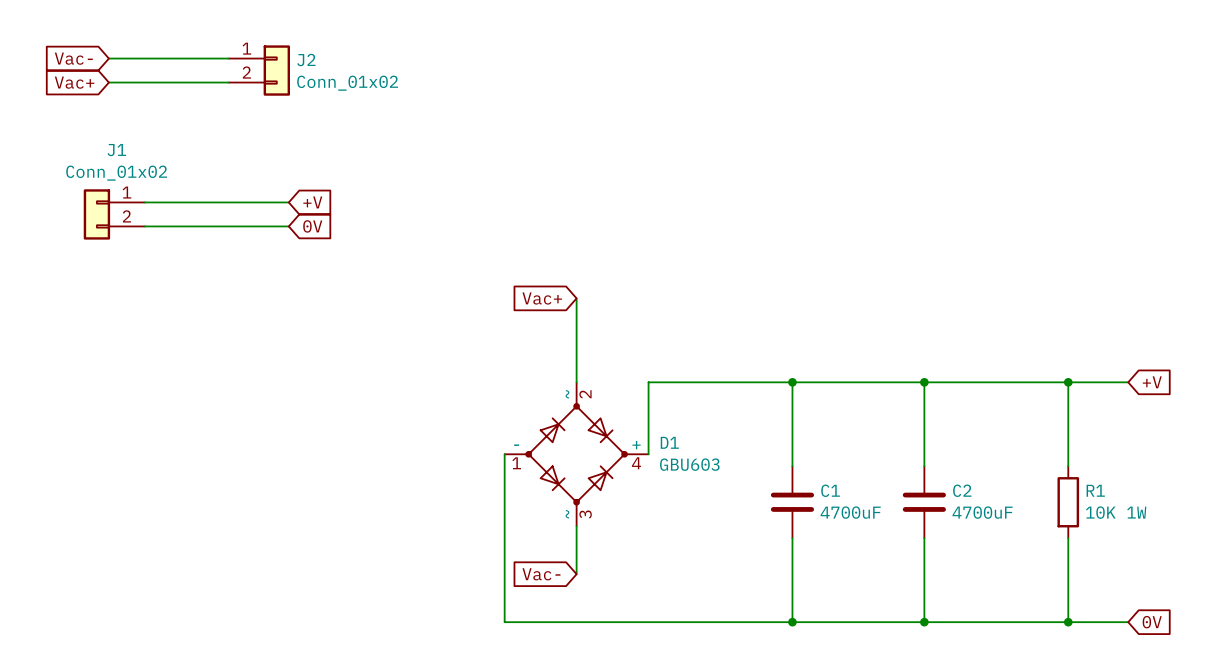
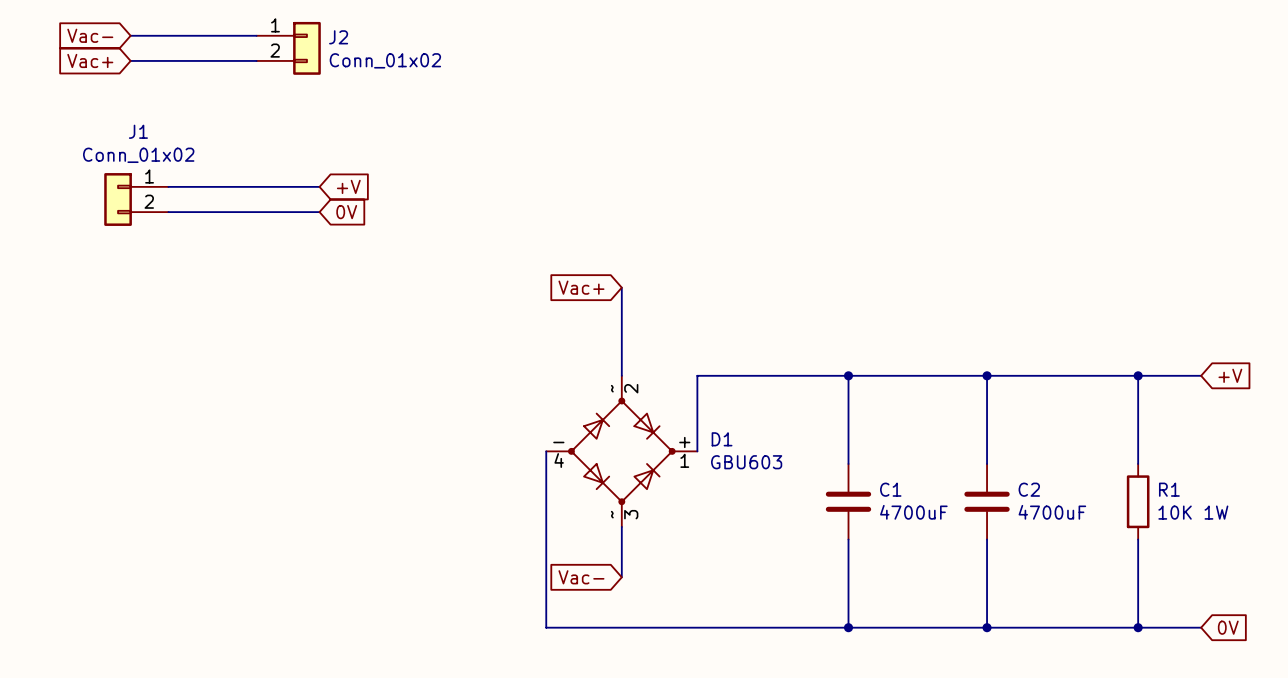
D1 pin number: 1 (516, 463) -> 4 (559, 460)
D1 pin number: 4 (636, 463) -> 1 (684, 460)

